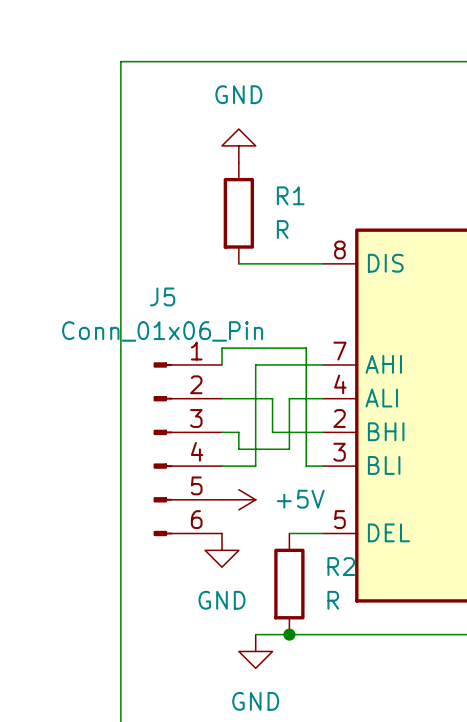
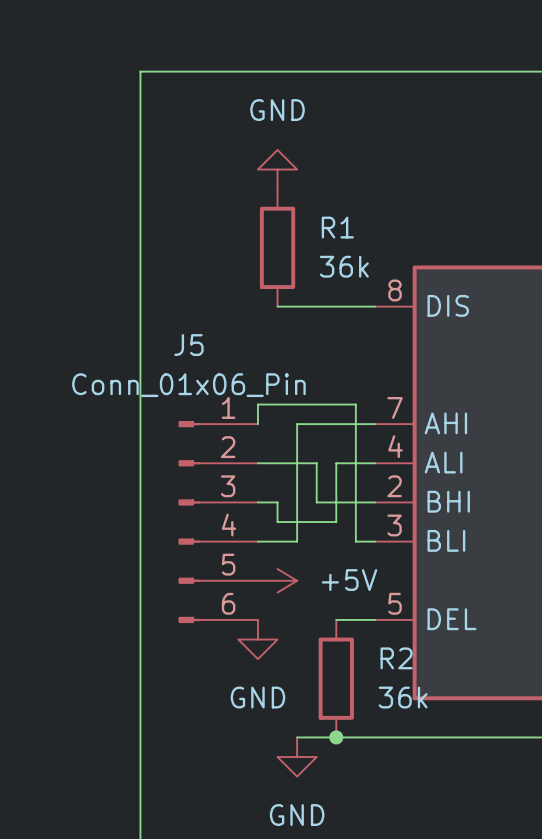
R1 value: R (282, 229) -> 36k (344, 266)
R2 value: R (333, 600) -> 36k (403, 697)

